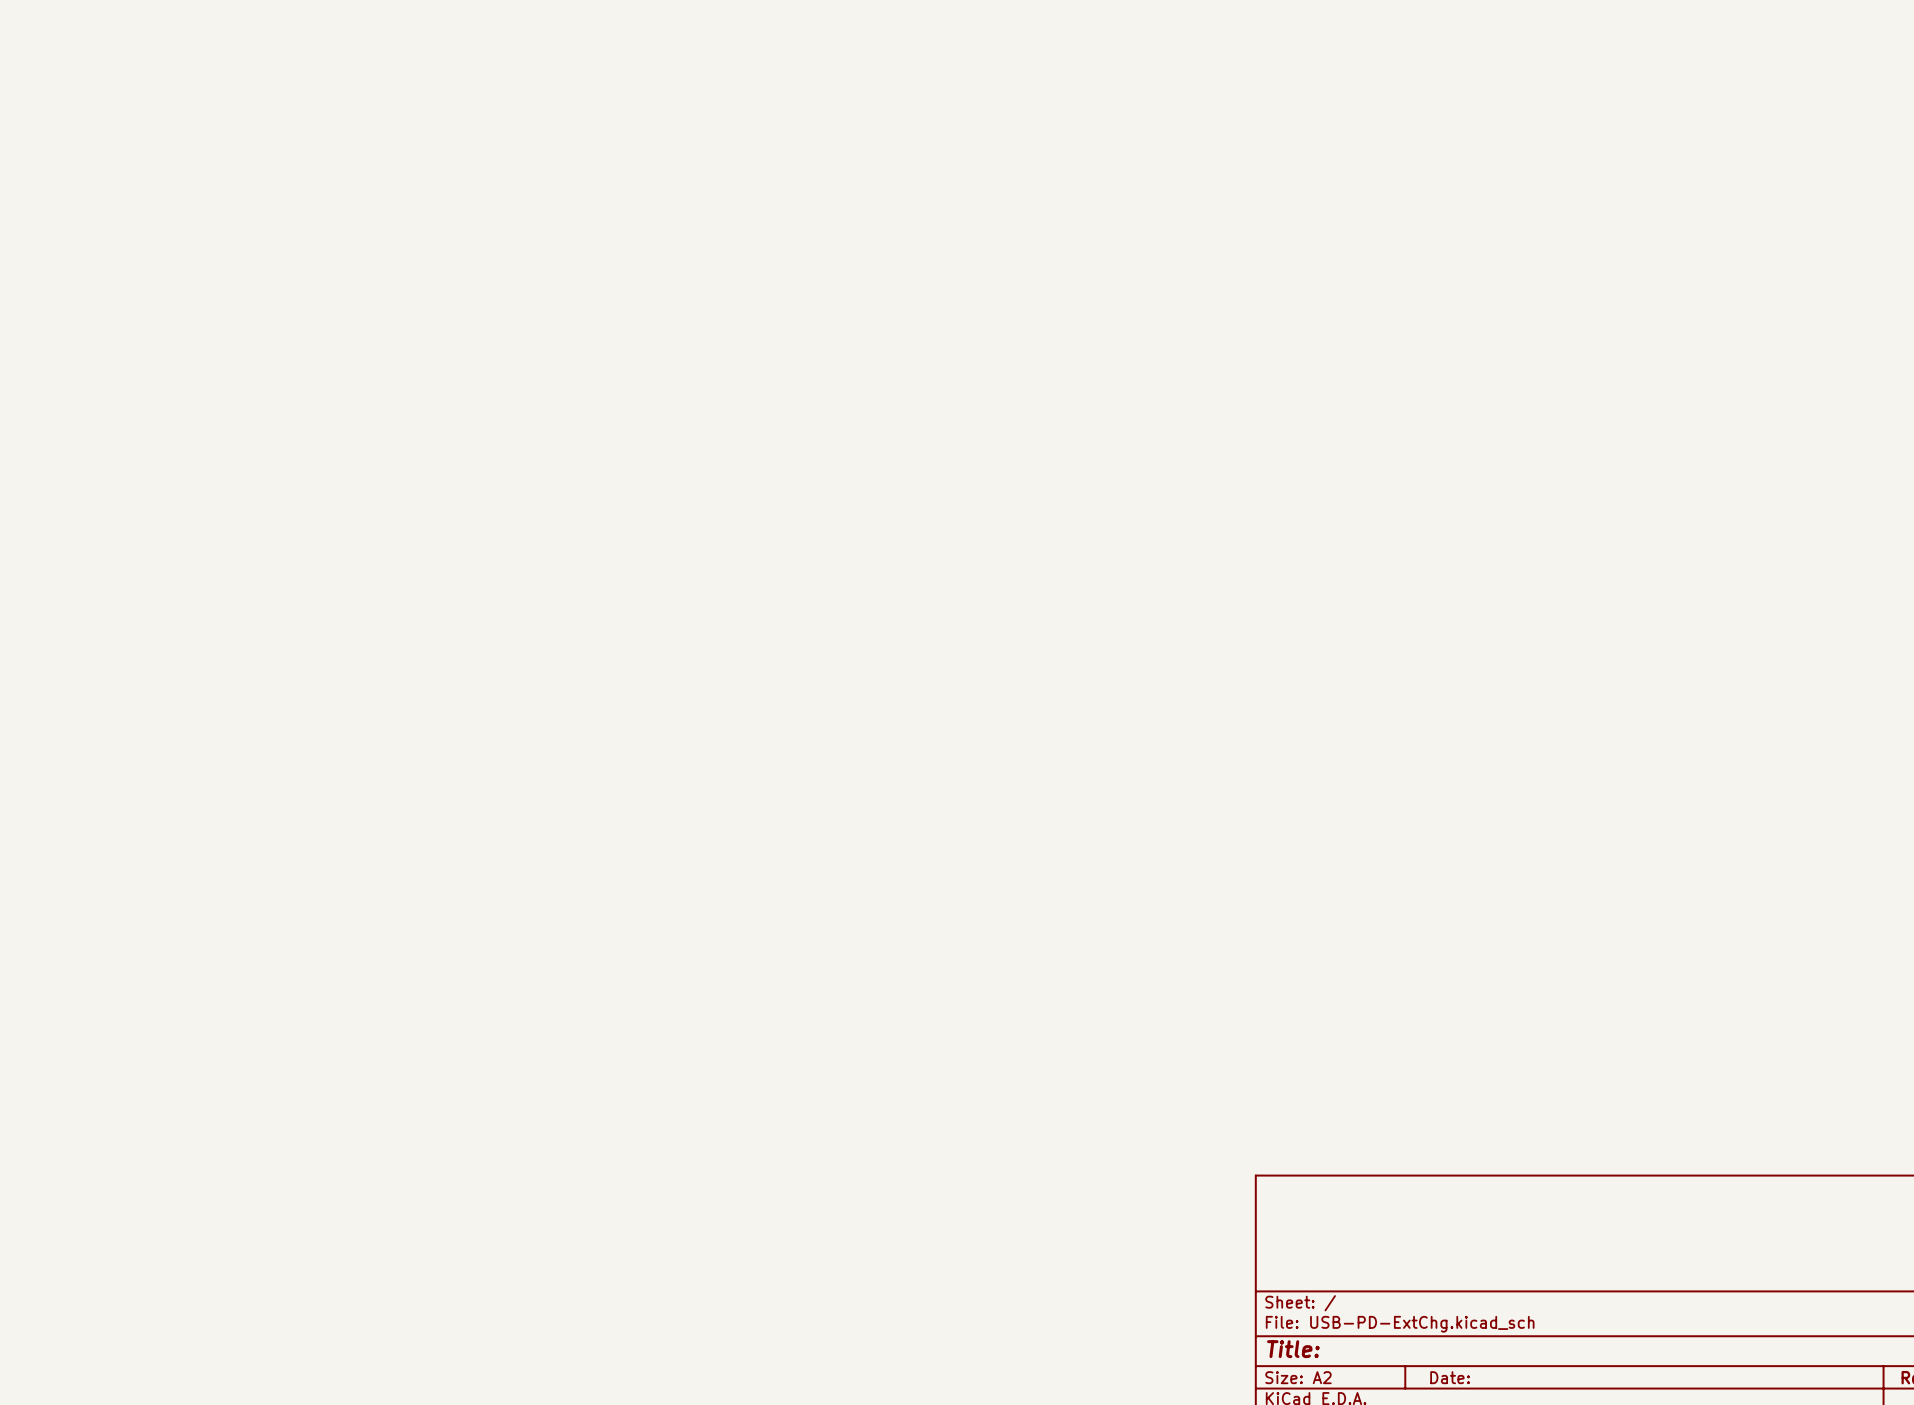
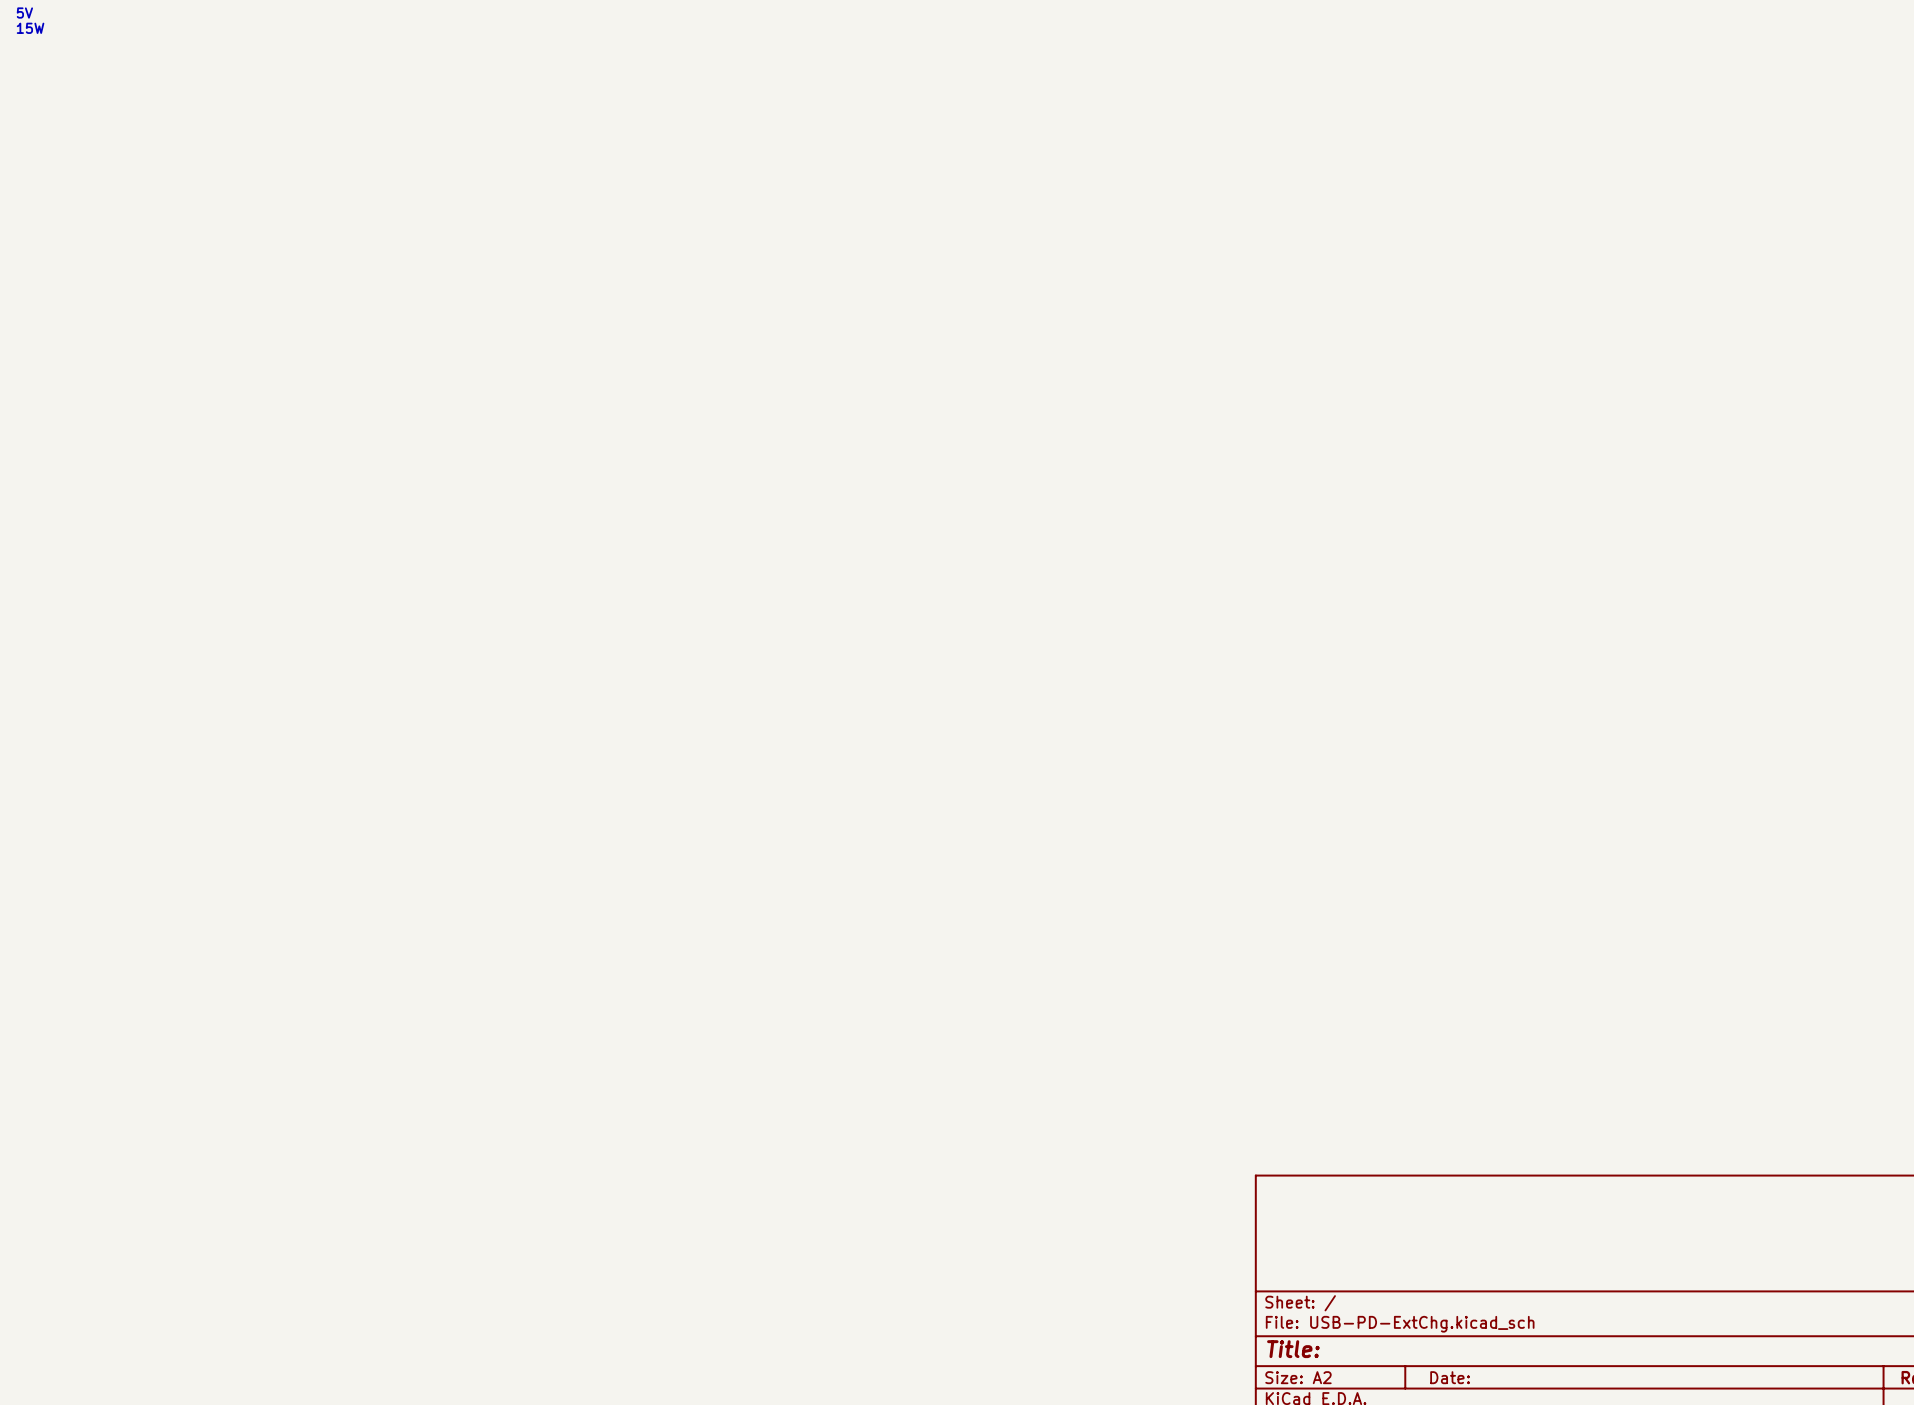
text: none -> 5V (24, 13)
text: none -> 15W (30, 28)

